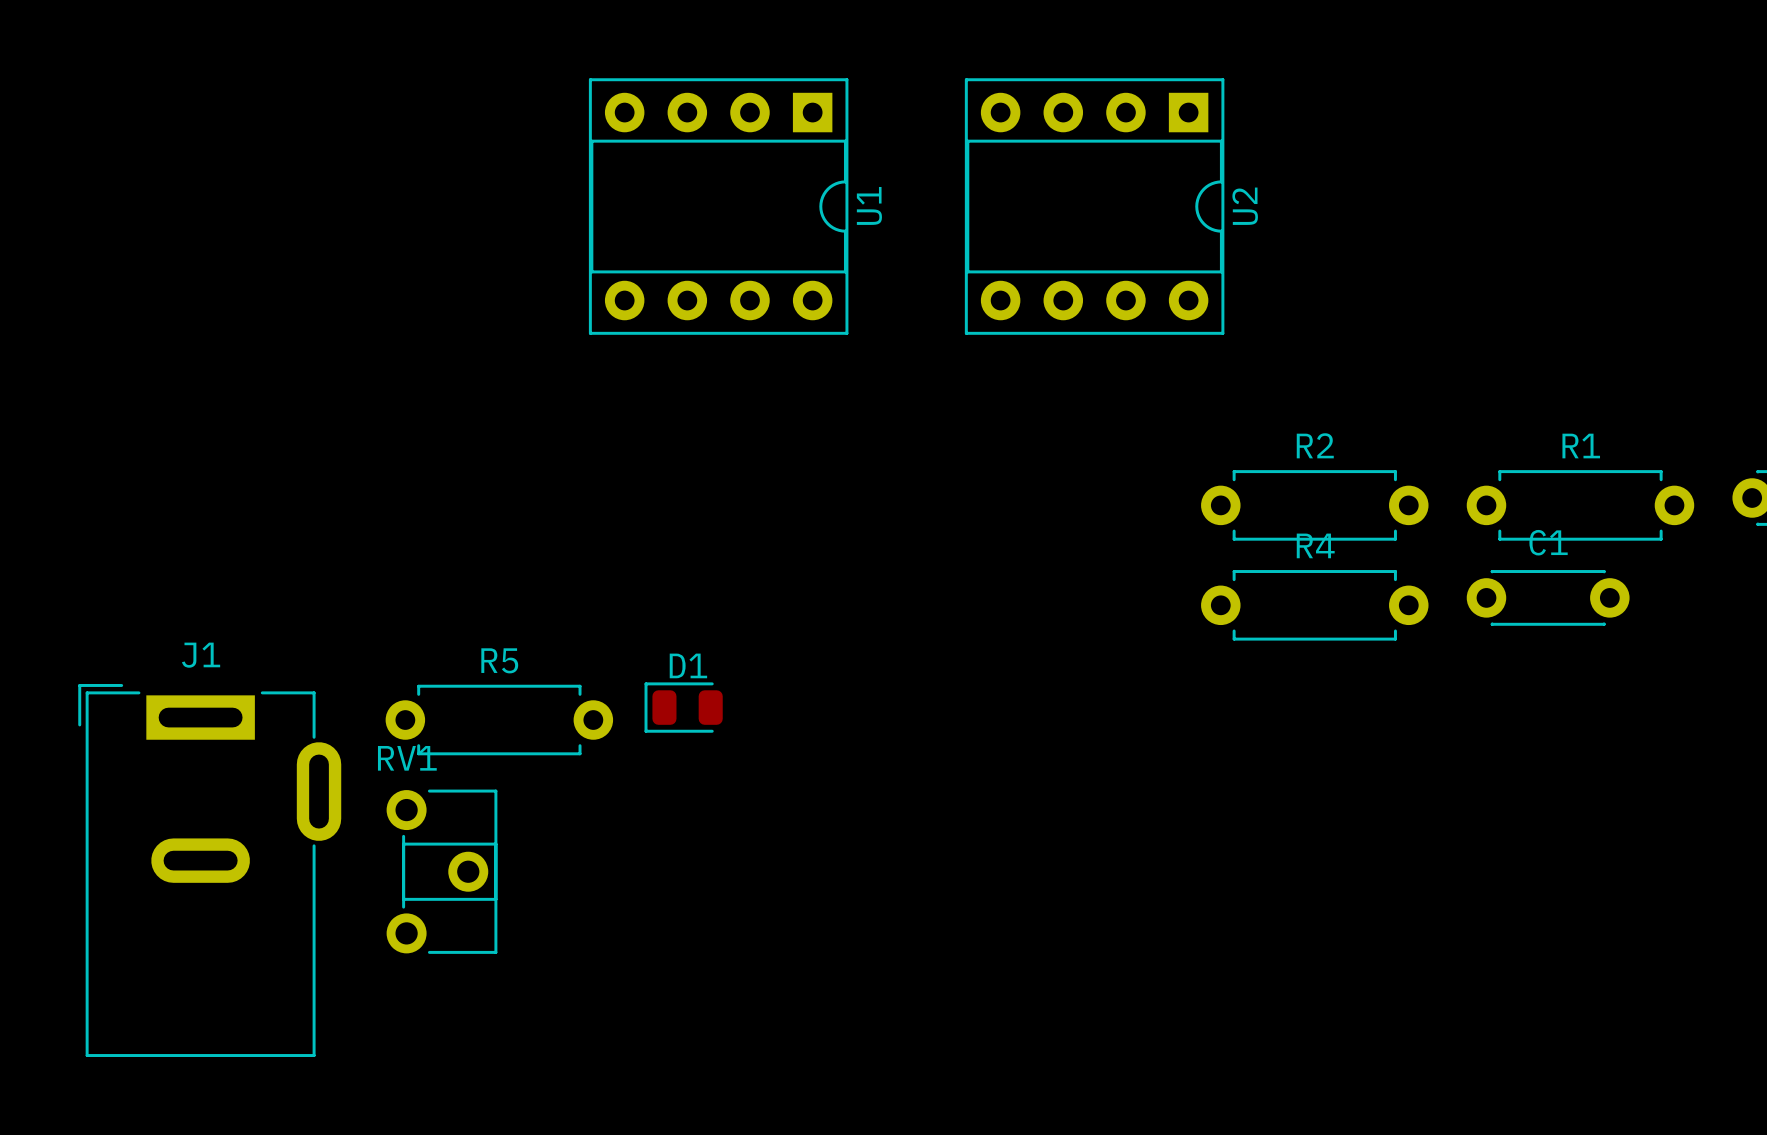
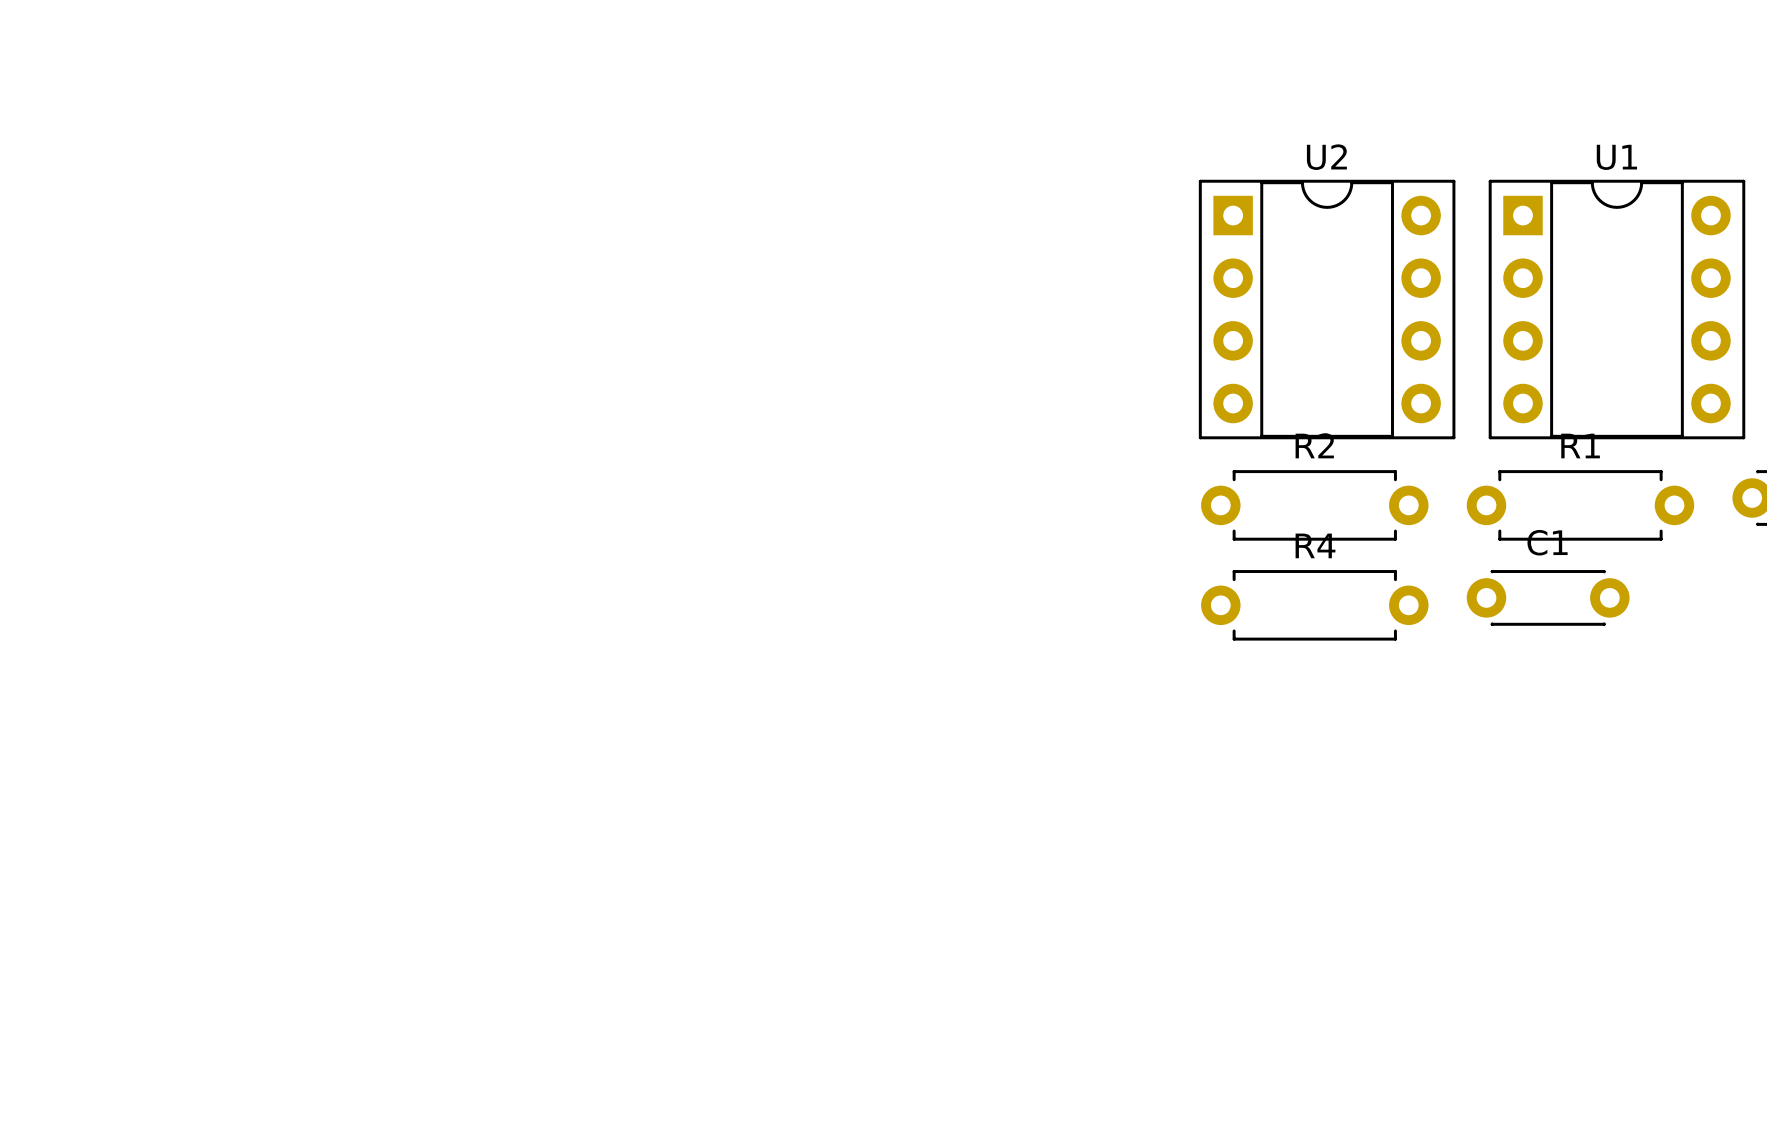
U1 rotation: 0° (718, 206) -> 90° counterclockwise (1616, 309)
U1 position: (718, 206) -> (1616, 309)
U2 rotation: 0° (1094, 206) -> 90° counterclockwise (1327, 309)
U2 position: (1094, 206) -> (1327, 309)
D1: (683, 707) -> none
R5: (499, 720) -> none
J1: (209, 870) -> none
RV1: (442, 871) -> none

